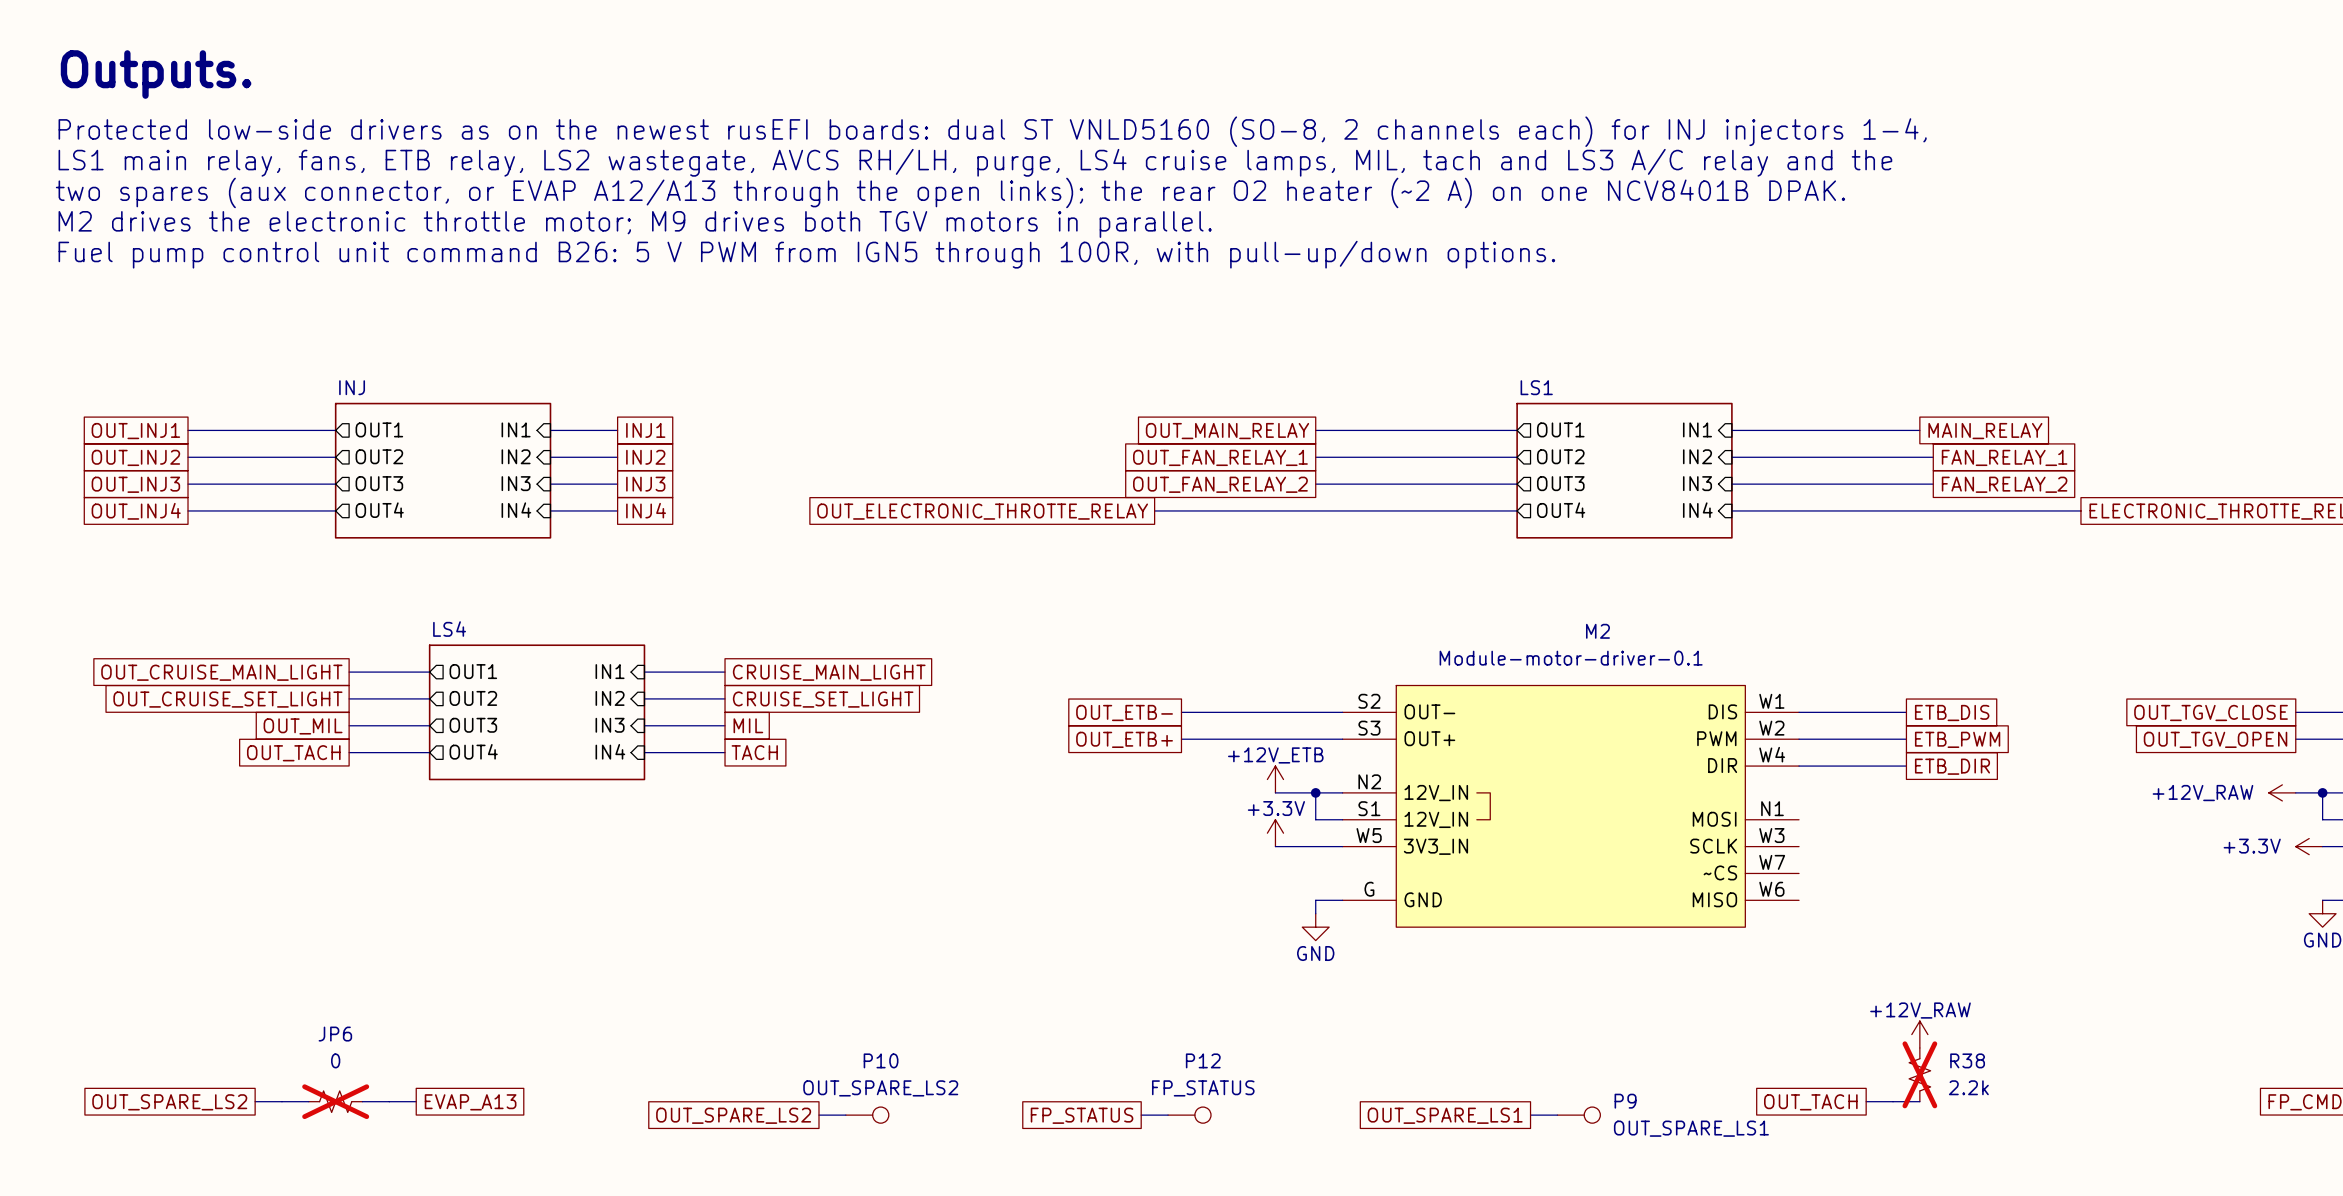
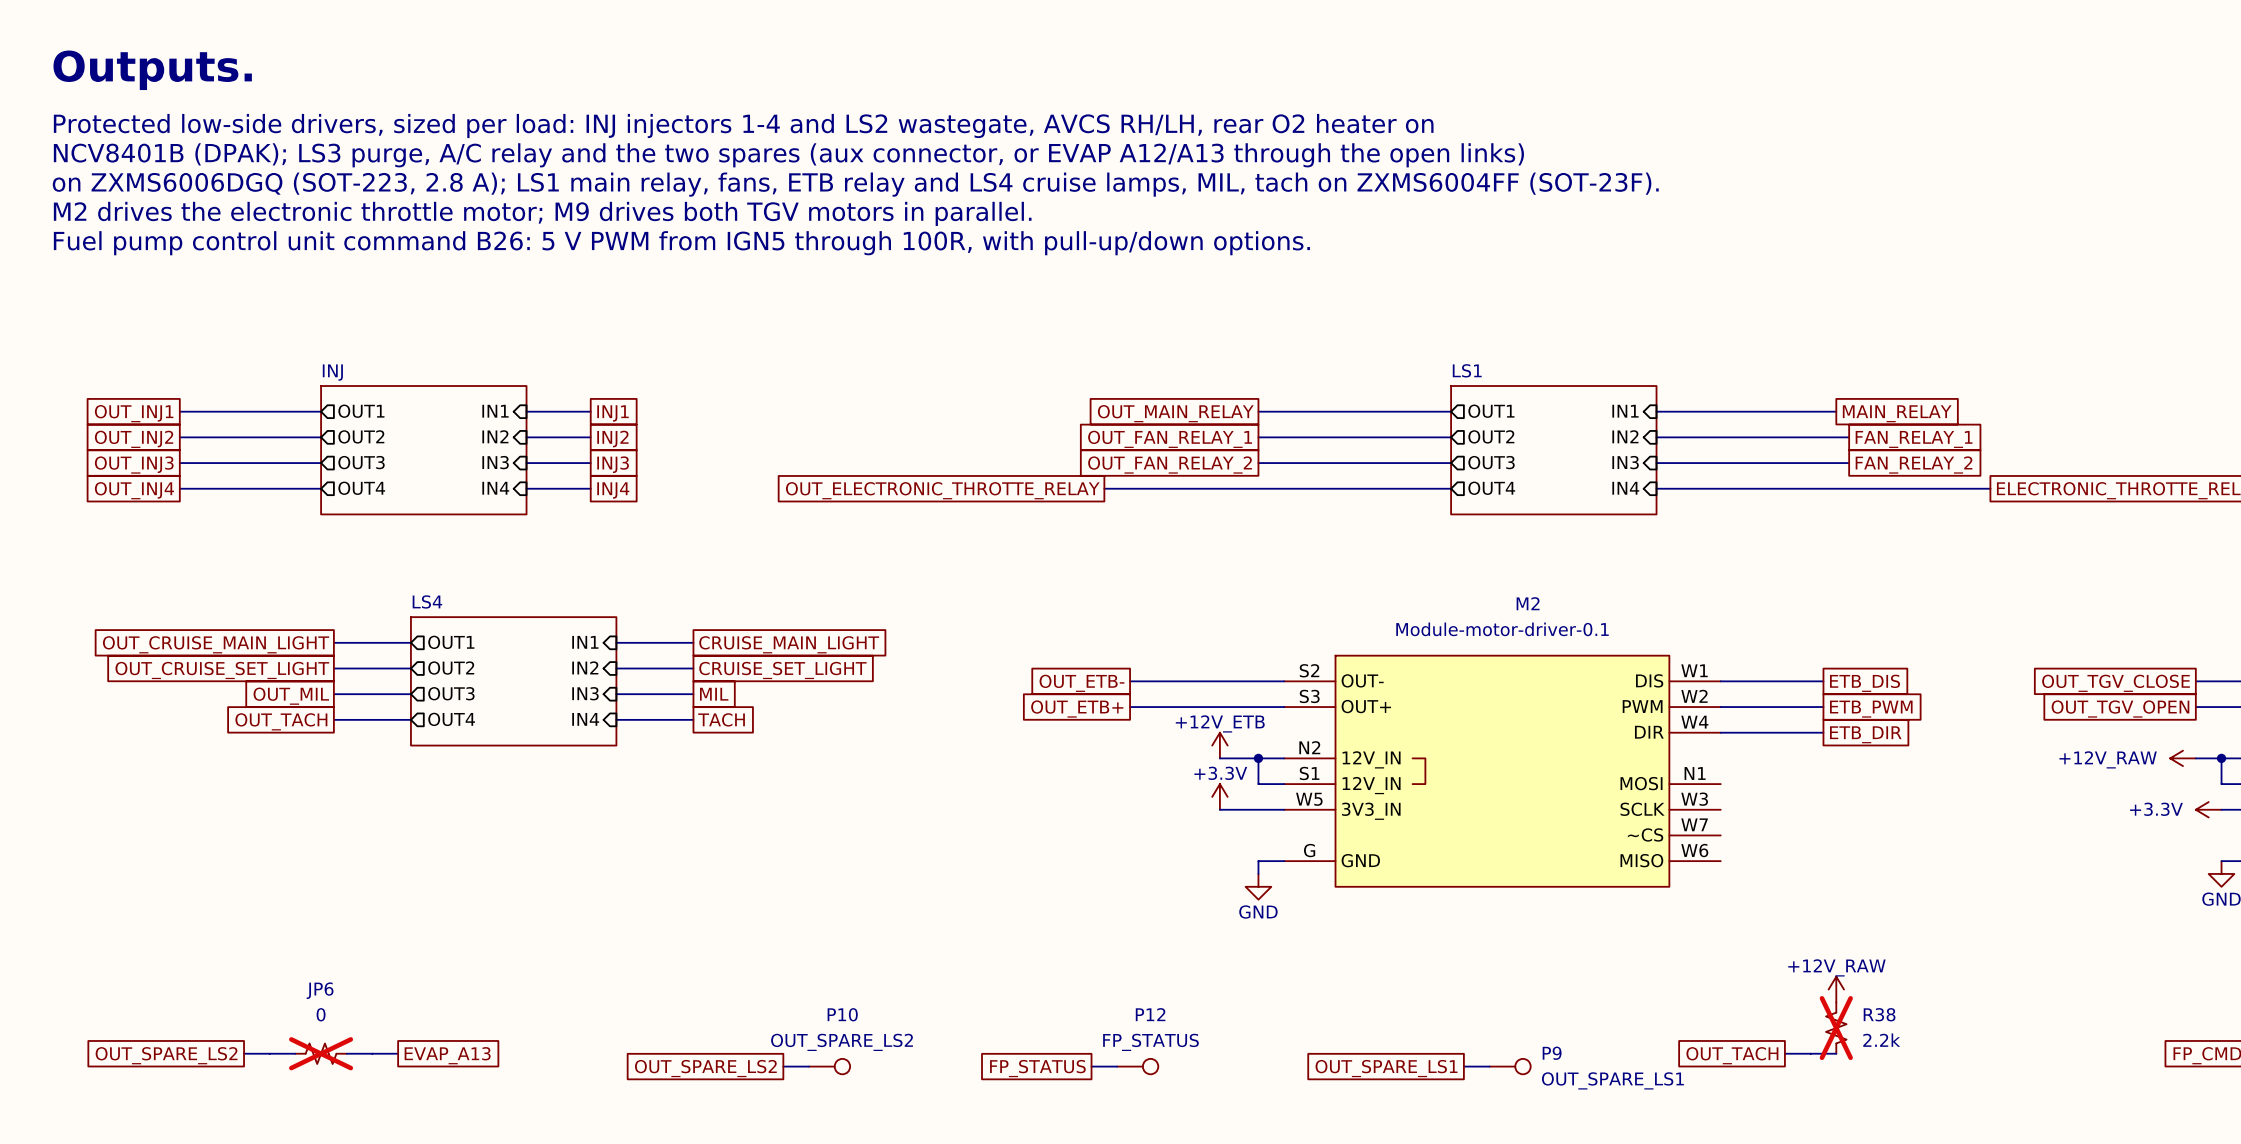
text: Protected low-side drivers as on the newest rusEFI boards: dual ST VNLD5160 (SO-8, 2 channels each) for INJ injectors 1-4, (992, 131) -> Protected low-side drivers, sized per load: INJ injectors 1-4 and LS2 wastegate, AVCS RH/LH, rear O2 heater on (743, 126)
text: LS1 main relay, fans, ETB relay, LS2 wastegate, AVCS RH/LH, purge, LS4 cruise lamps, MIL, tach and LS3 A/C relay and the (975, 162) -> NCV8401B (DPAK); LS3 purge, A/C relay and the two spares (aux connector, or EVAP A12/A13 through the open links) (788, 155)
text: two spares (aux connector, or EVAP A12/A13 through the open links); the rear O2 heater (~2 A) on one NCV8401B DPAK. (950, 192) -> on ZXMS6006DGQ (SOT-223, 2.8 A); LS1 main relay, fans, ETB relay and LS4 cruise lamps, MIL, tach on ZXMS6004FF (SOT-23F). (855, 184)

